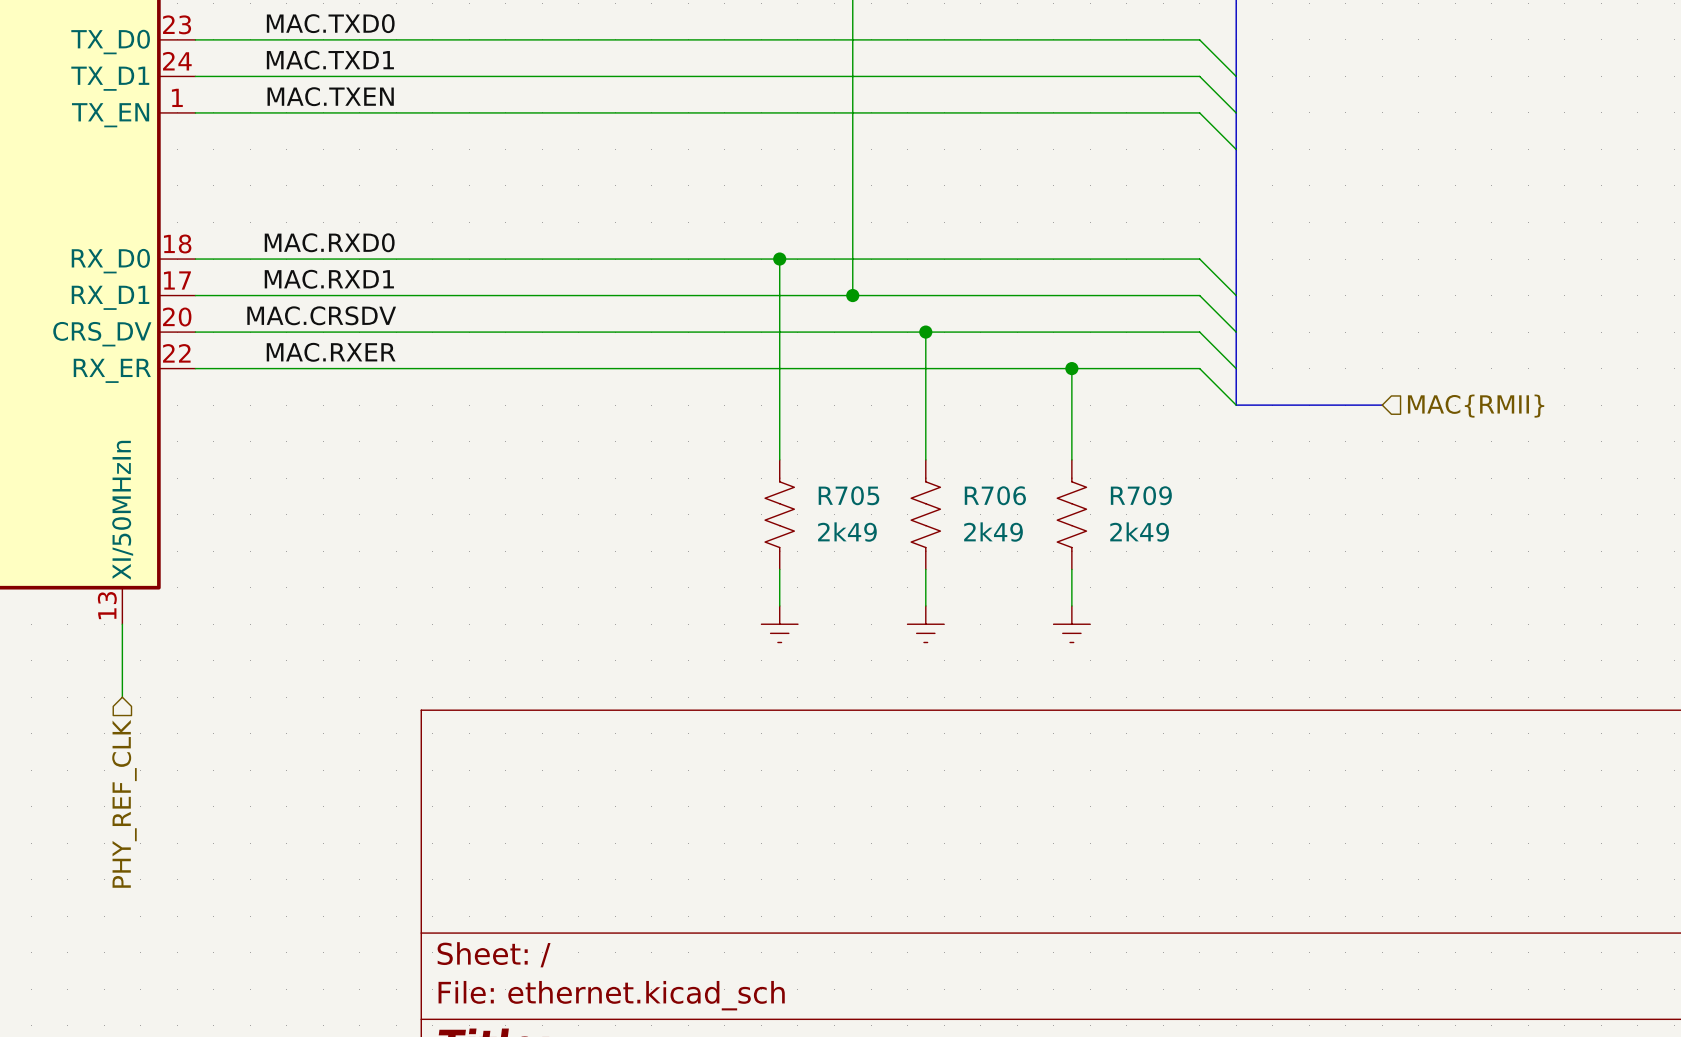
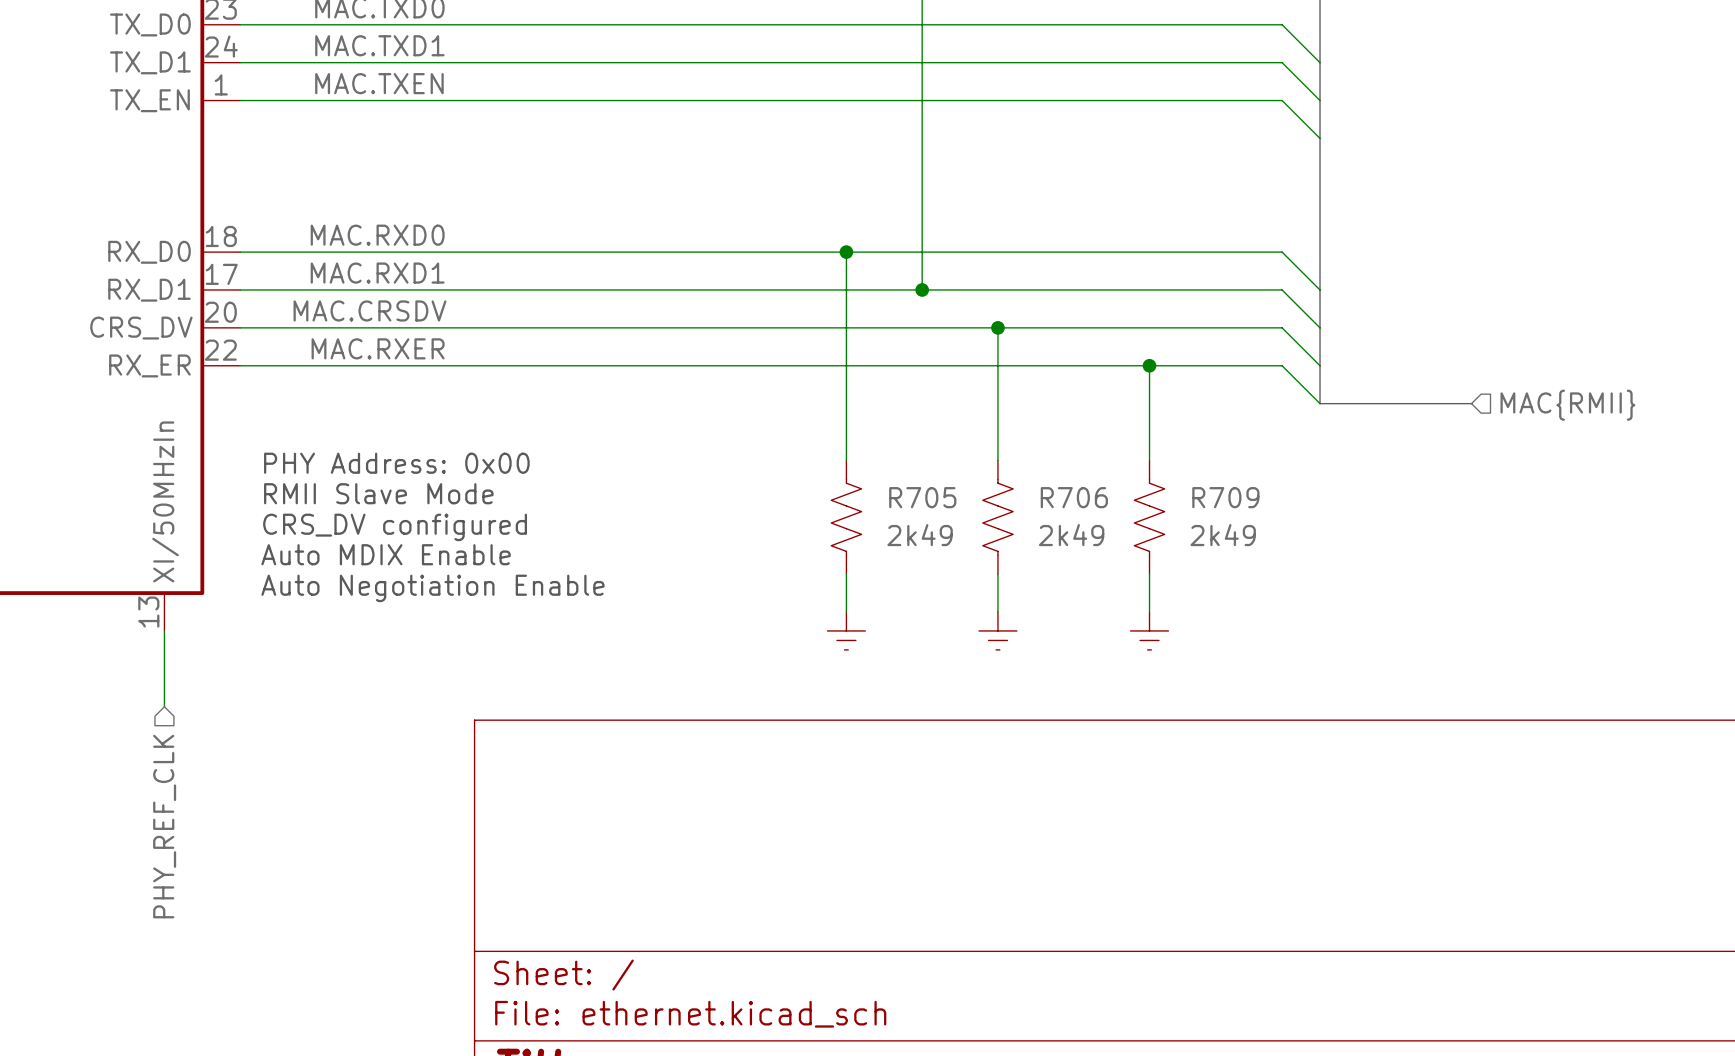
text: none -> PHY Address: 0x00 (396, 463)
text: none -> RMII Slave Mode (378, 493)
text: none -> CRS_DV configured (395, 527)
text: none -> Auto MDIX Enable (386, 554)
text: none -> Auto Negotiation Enable (432, 588)

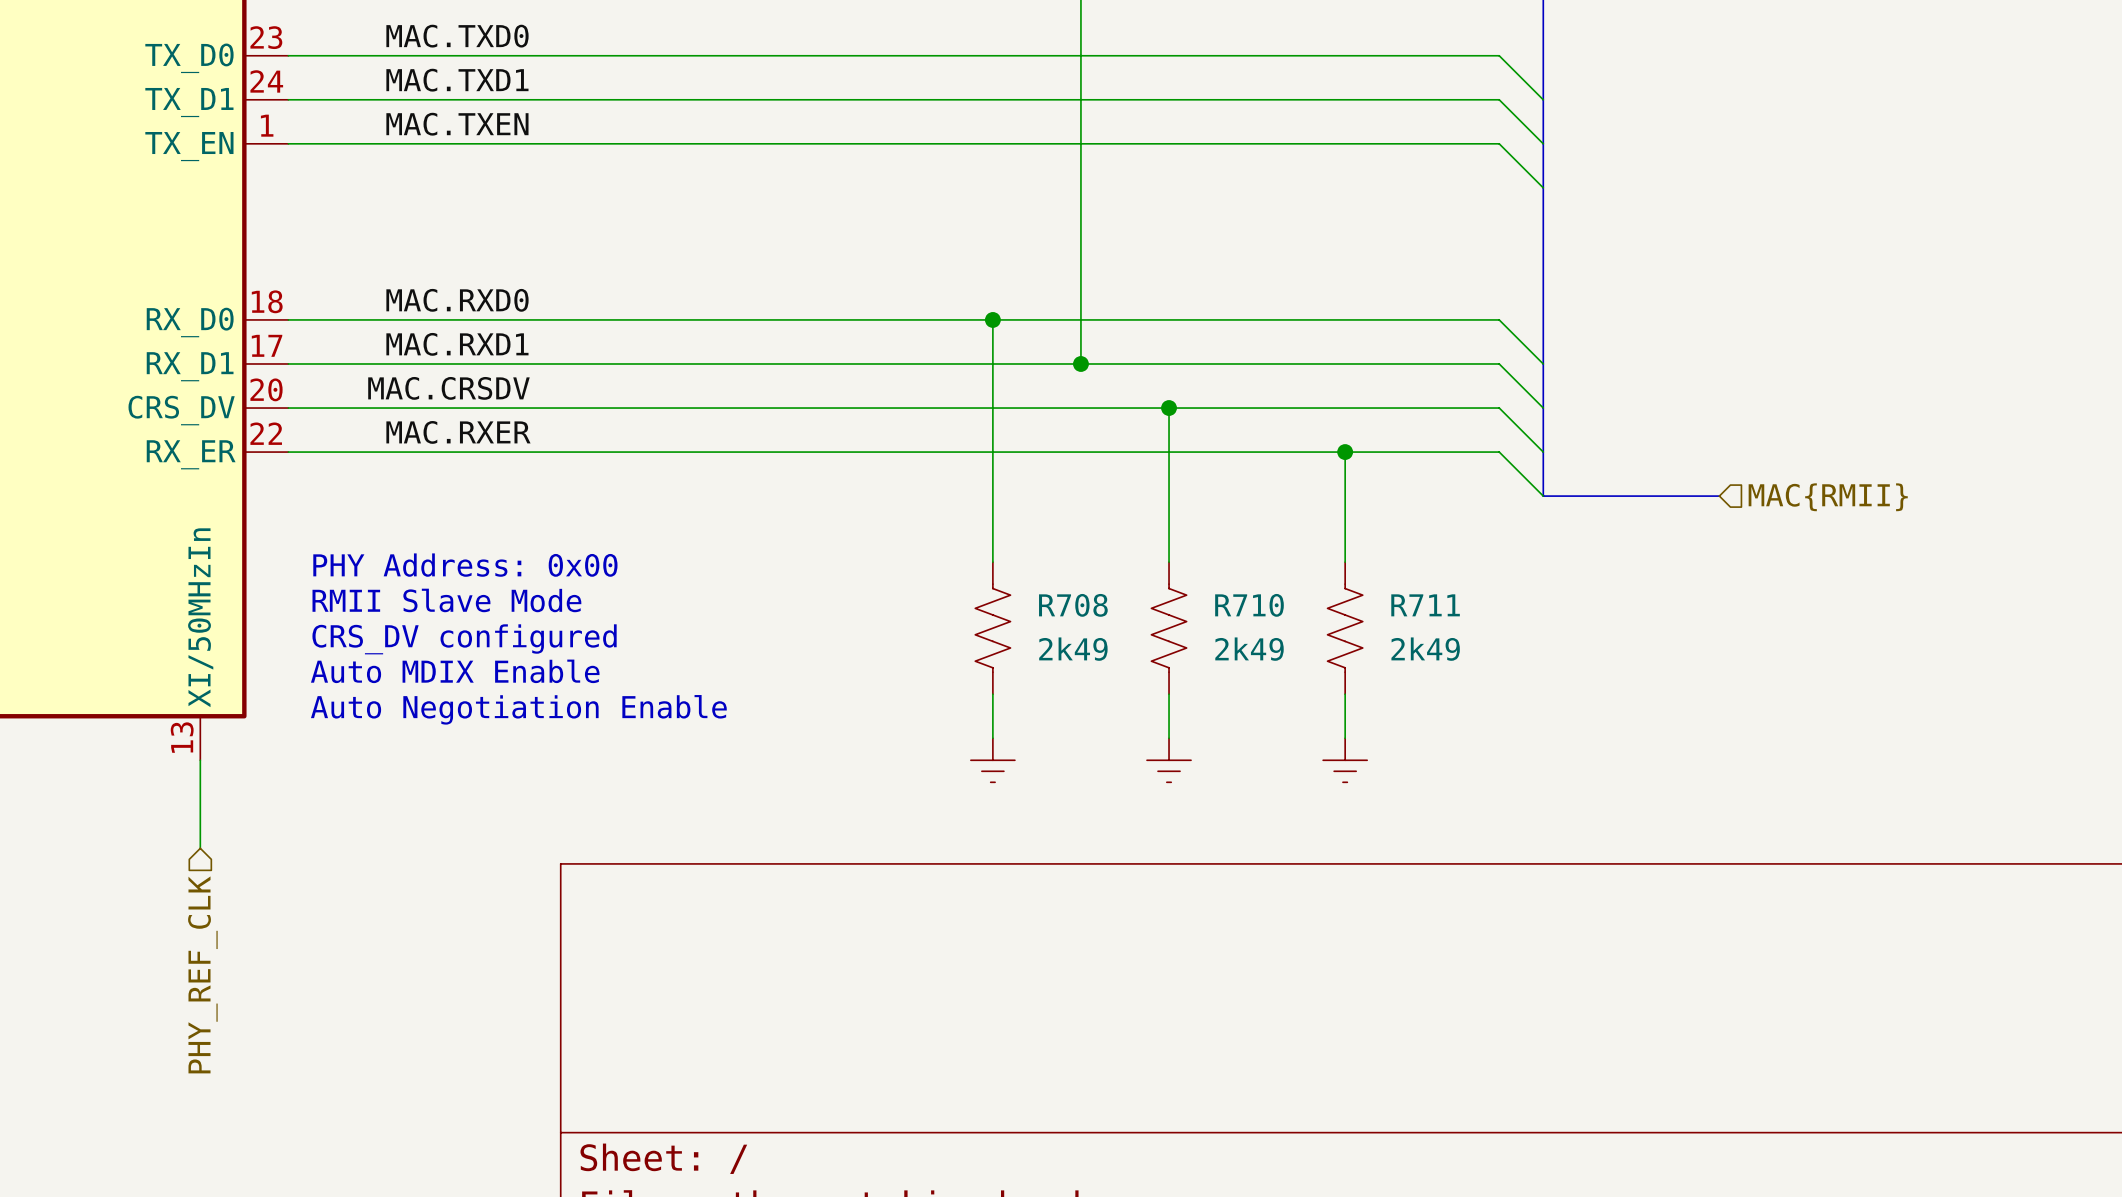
R705 name: R705 (922, 497) -> R708 (1073, 605)
R706 name: R706 (1074, 497) -> R710 (1249, 605)
R709 name: R709 (1225, 497) -> R711 (1425, 605)

